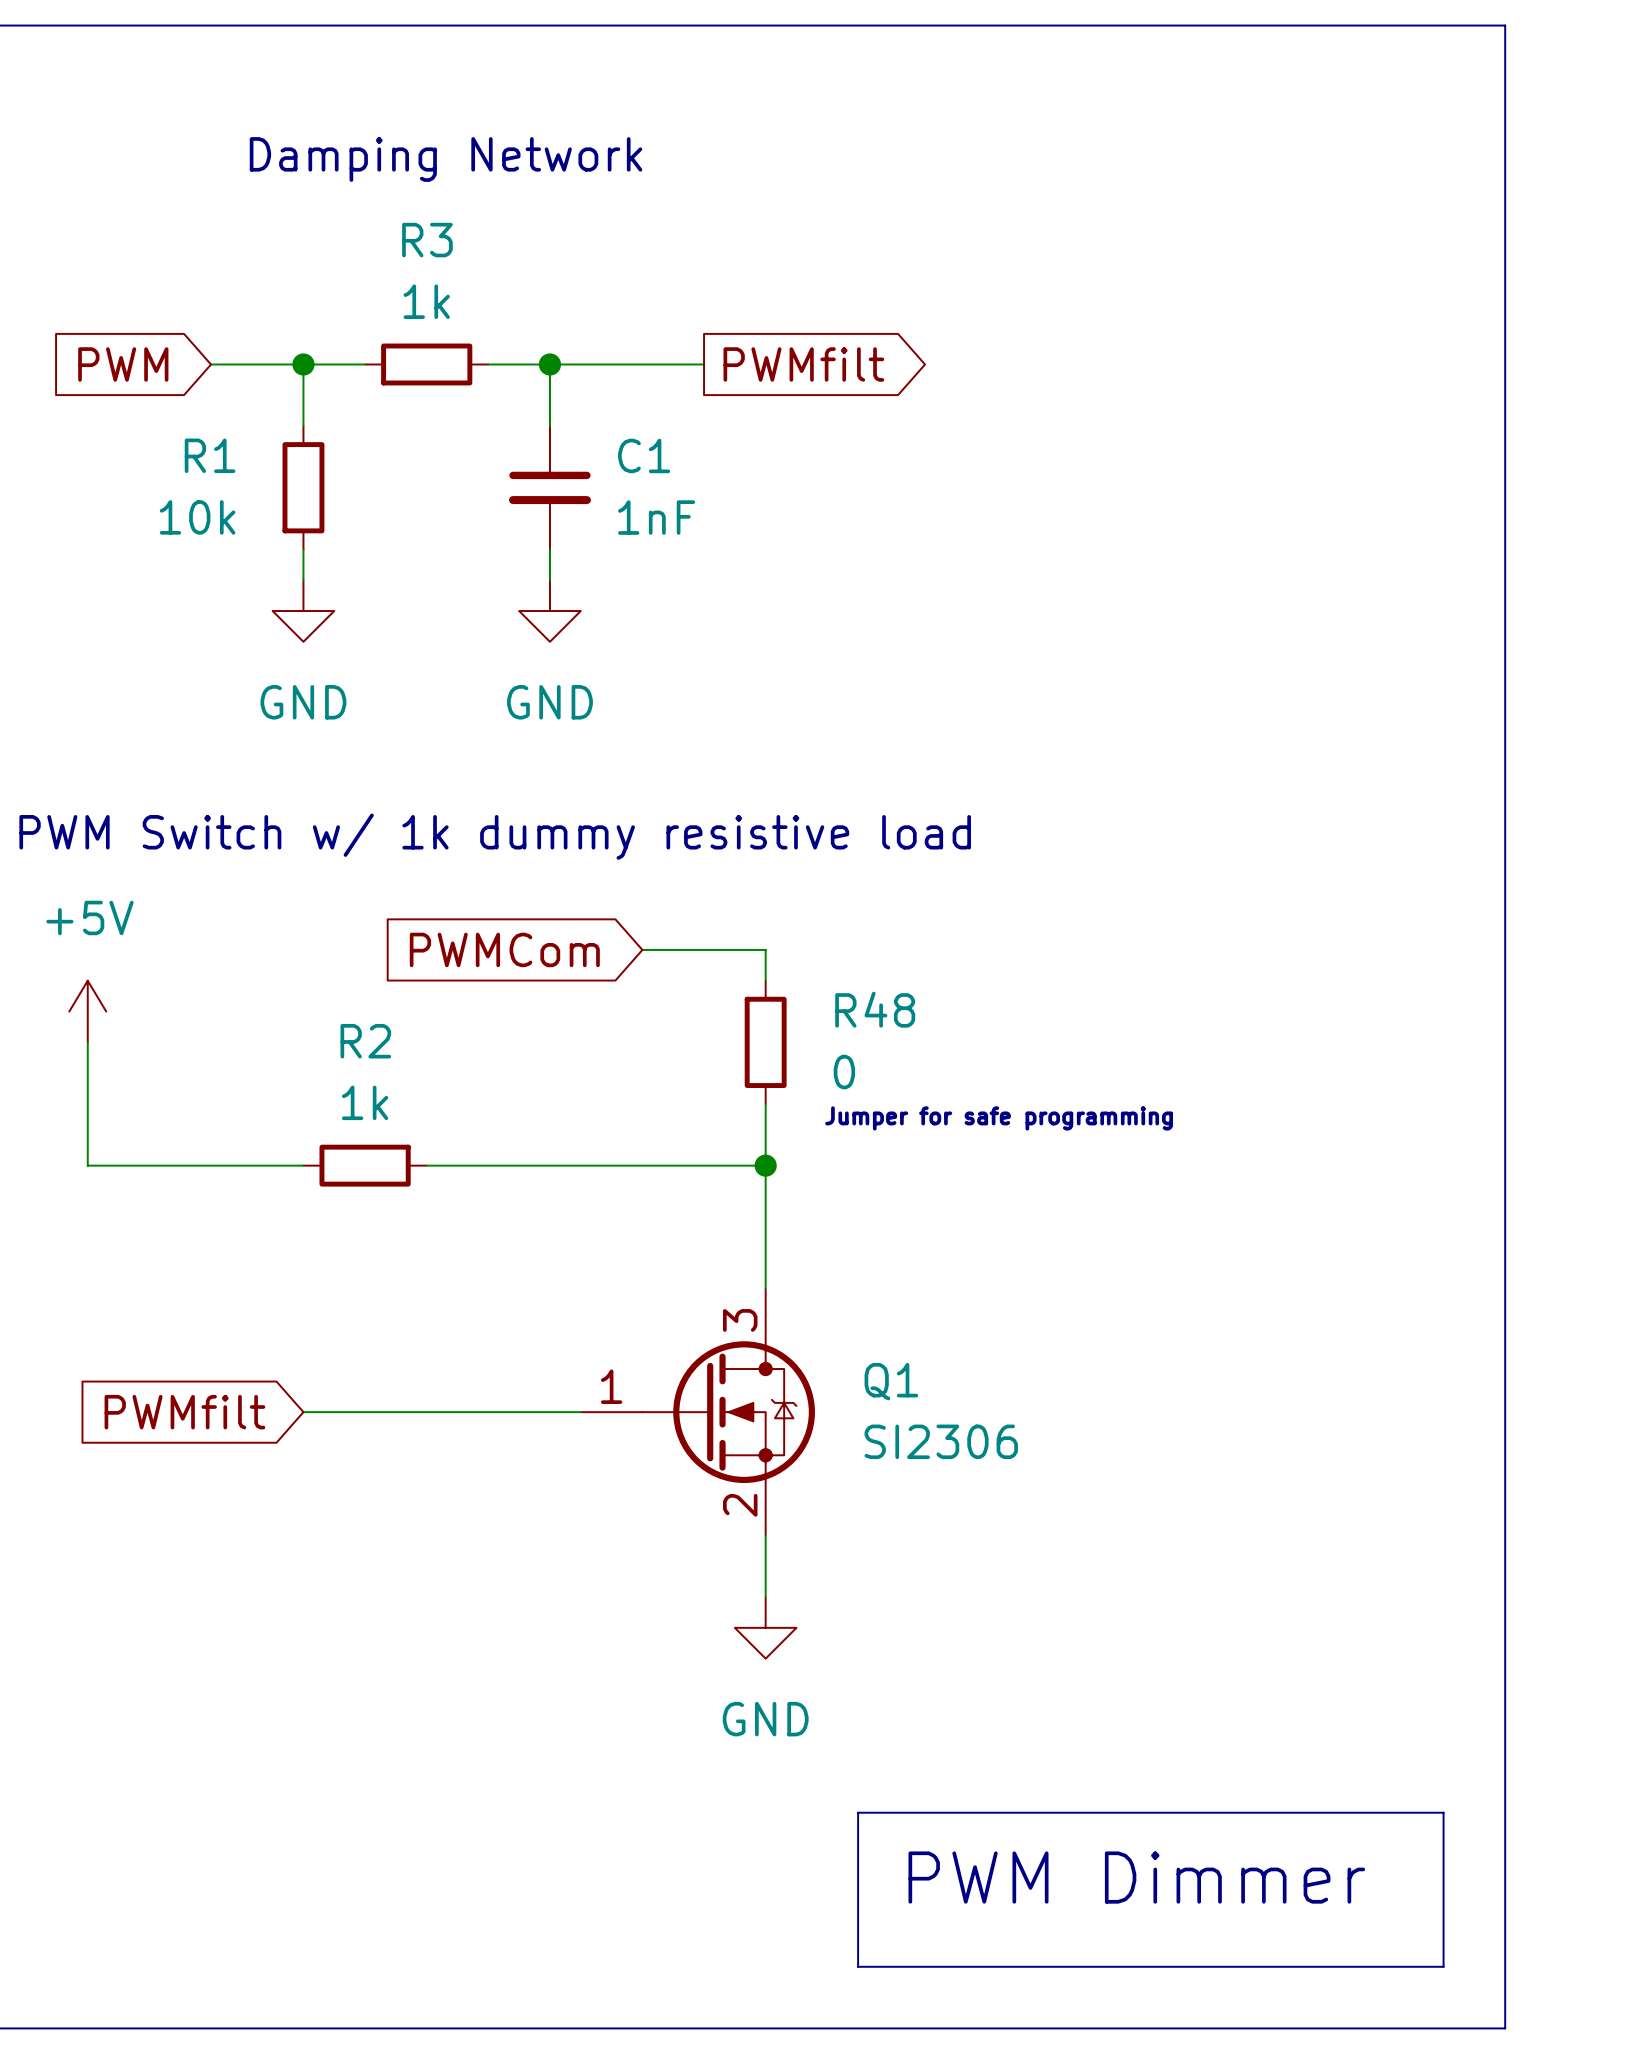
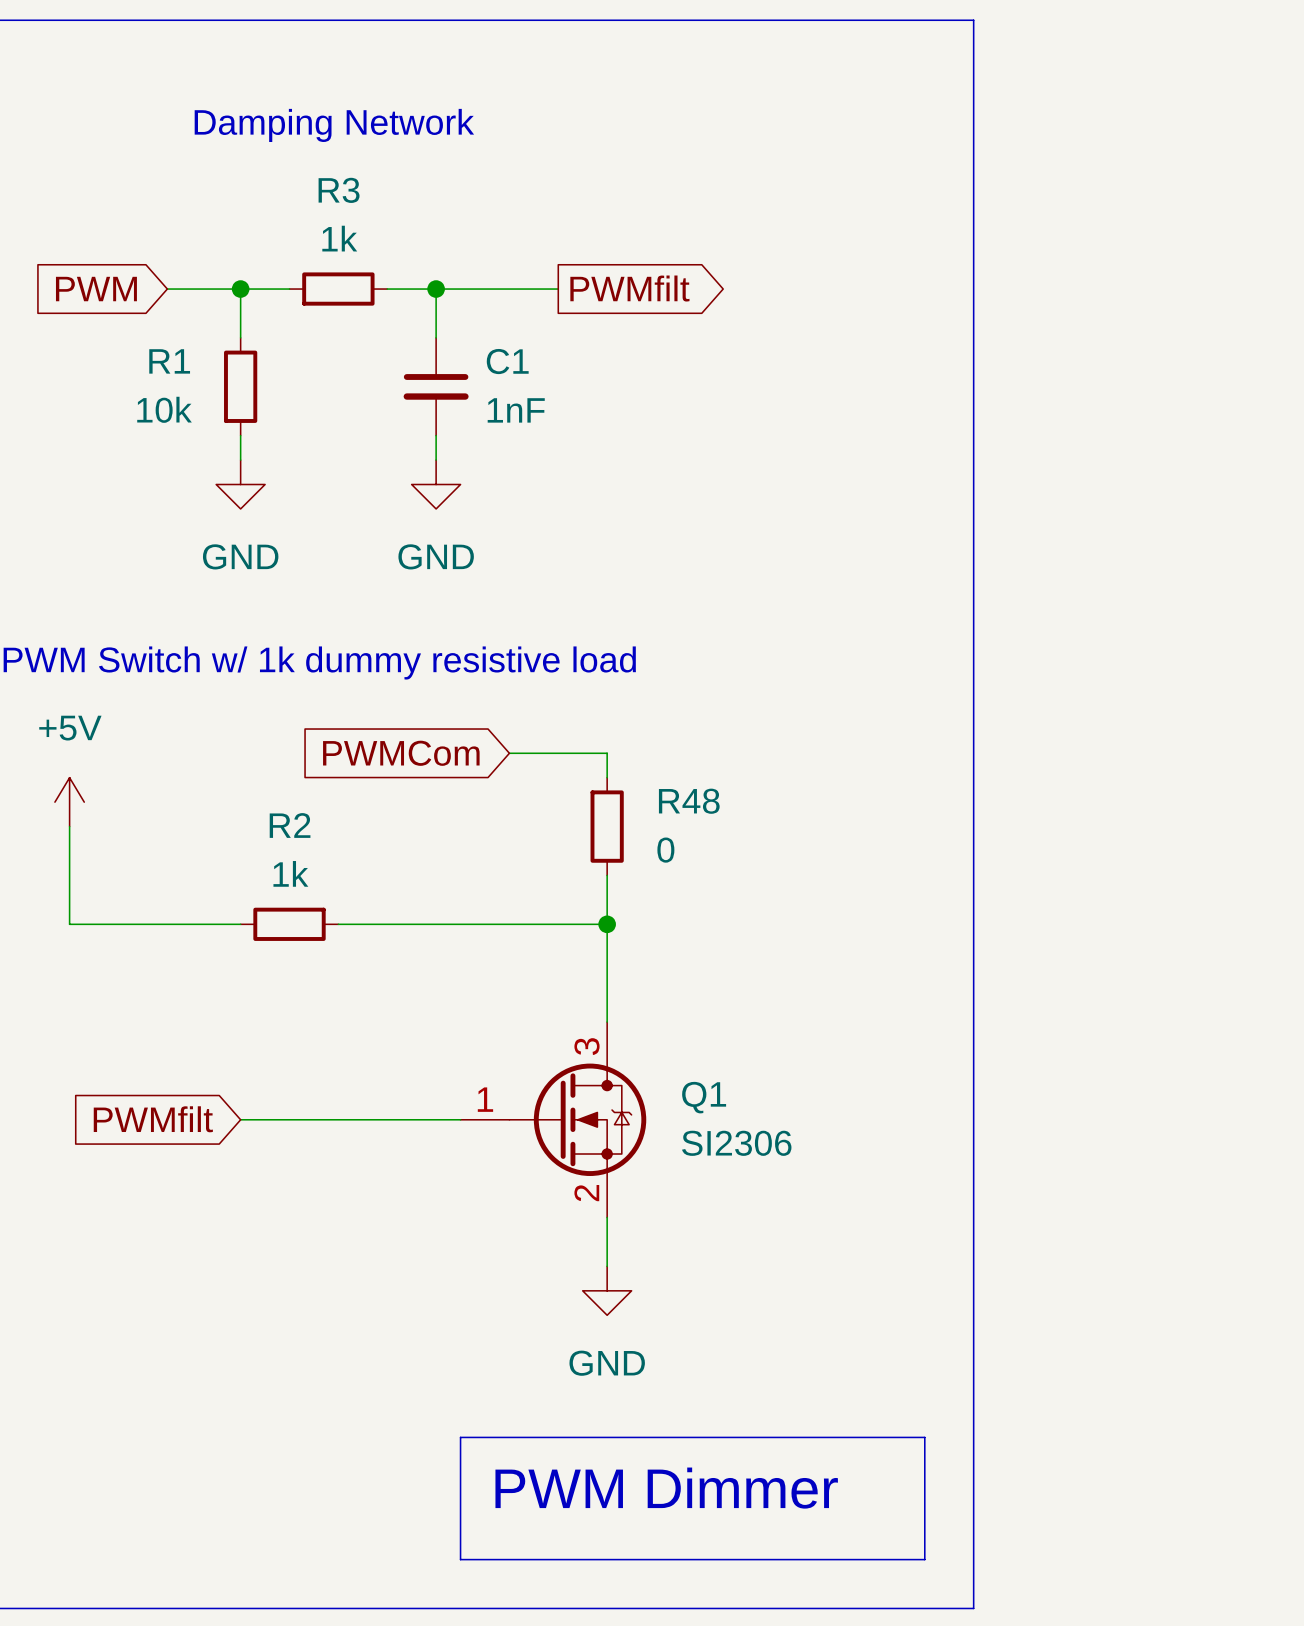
line: (1227, 25) (1505, 25) (1505, 2028) (1227, 2028) -> (973, 20) (973, 1608)
text: Jumper for safe programming (999, 1118) -> none
line: (858, 1812) (858, 1966) -> (680, 1437) (460, 1437) (460, 1559) (680, 1559)
line: (1166, 1812) (1443, 1812) (1443, 1966) (1166, 1966) -> (924, 1437) (924, 1559)
text position: PWM Dimmer (1136, 1877) -> PWM Dimmer (666, 1488)

